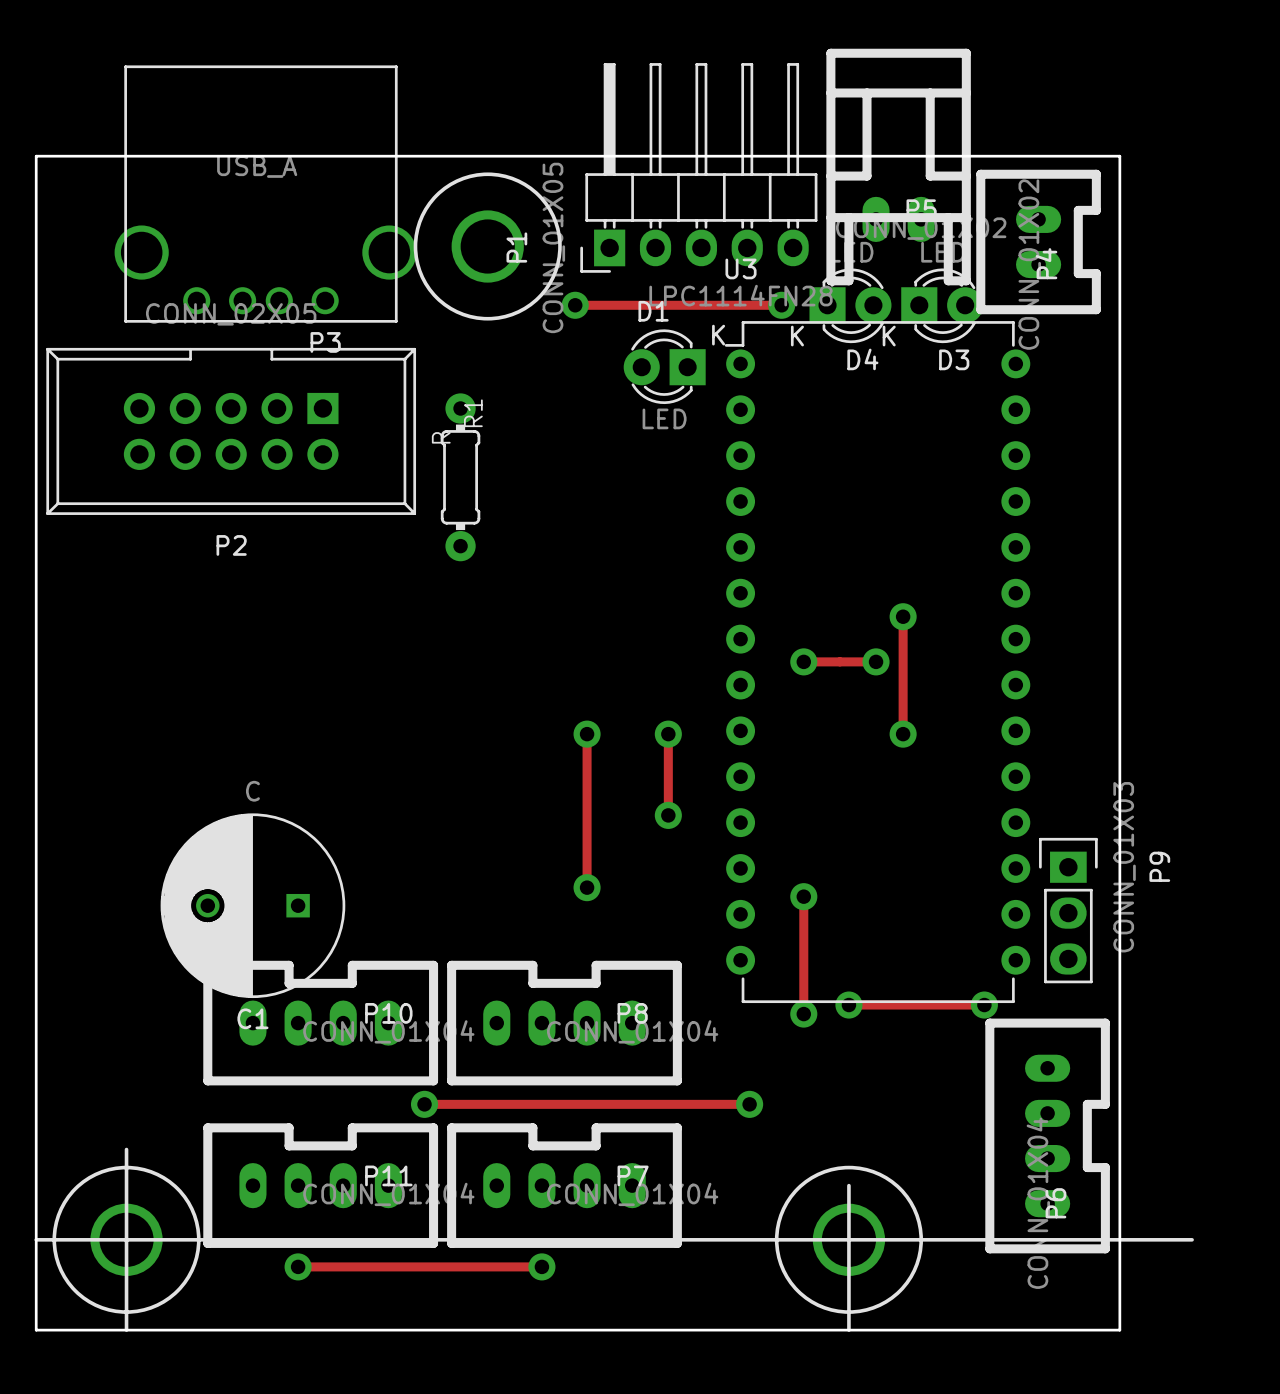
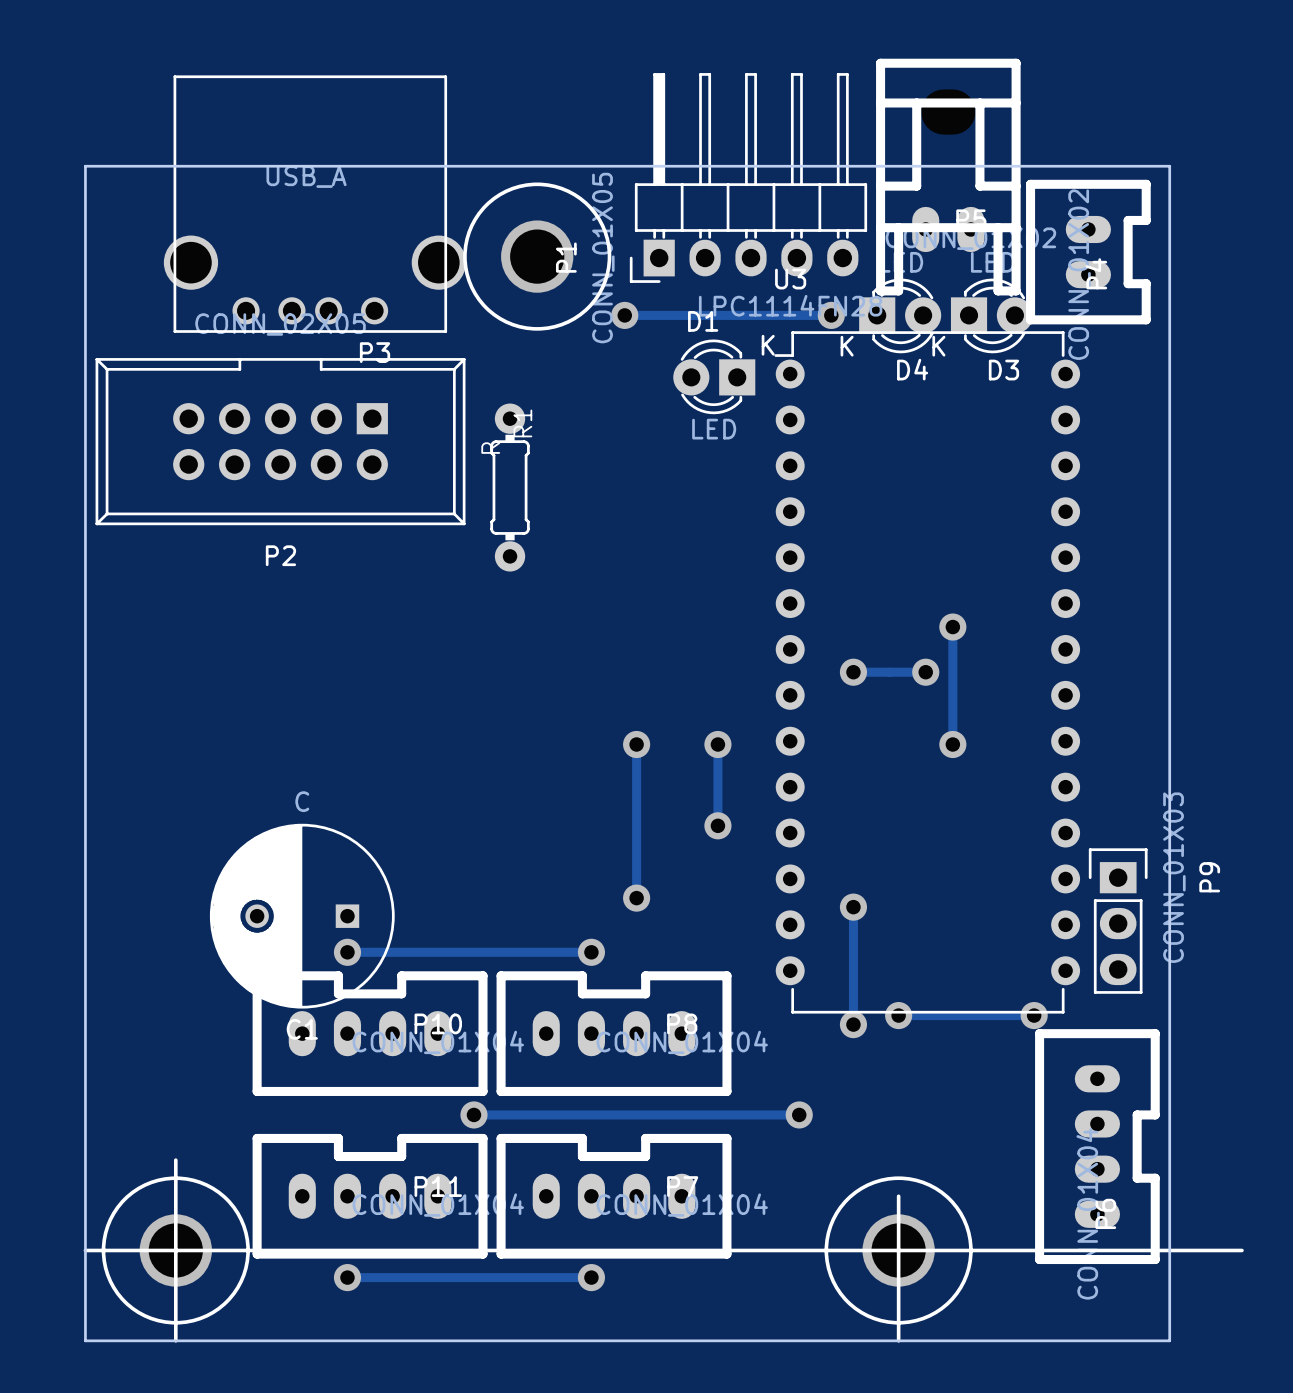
track: none -> (347, 952) (591, 952)
via: none -> (347, 952)
via: none -> (591, 952)

